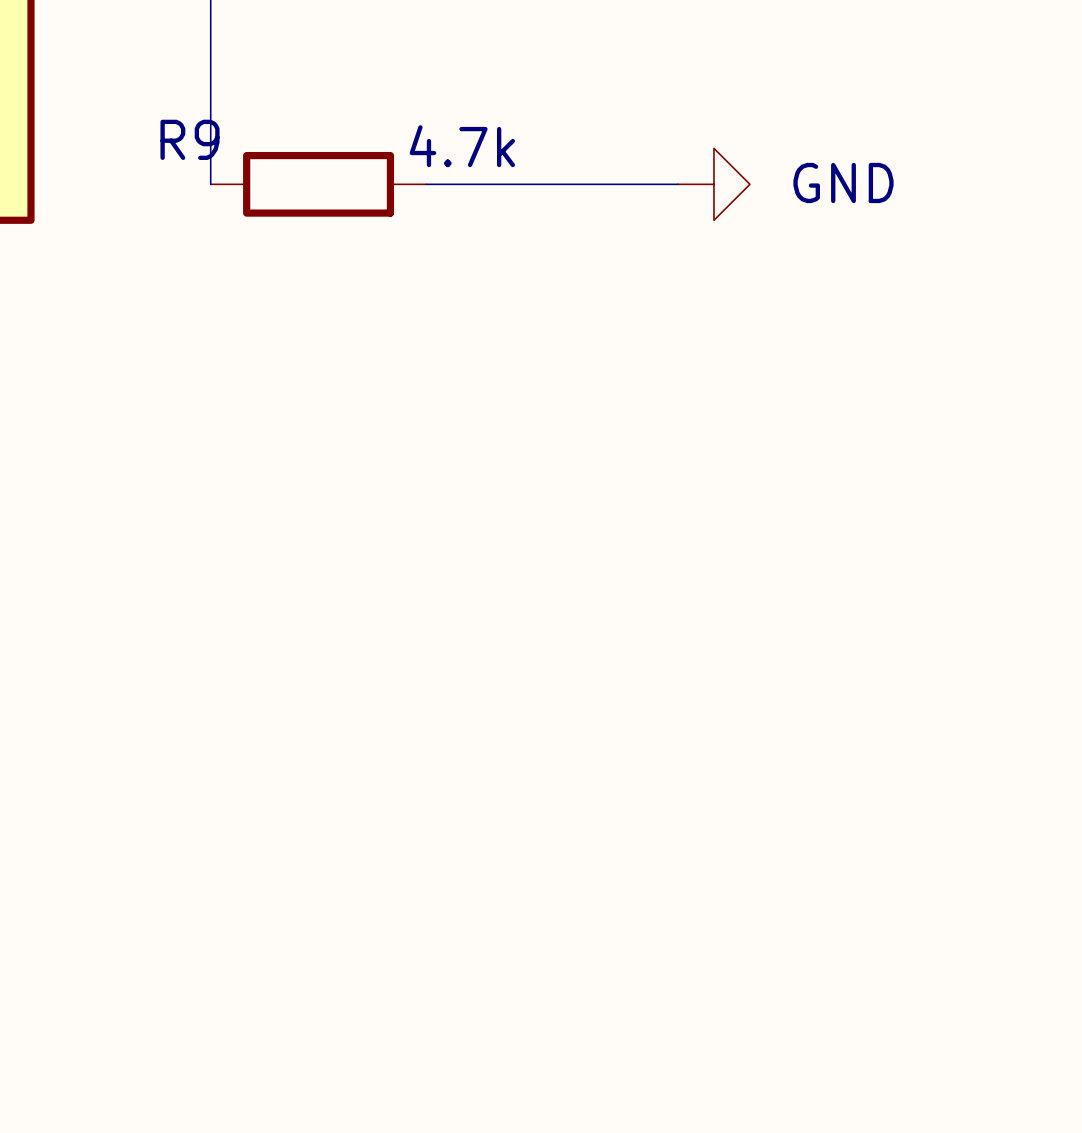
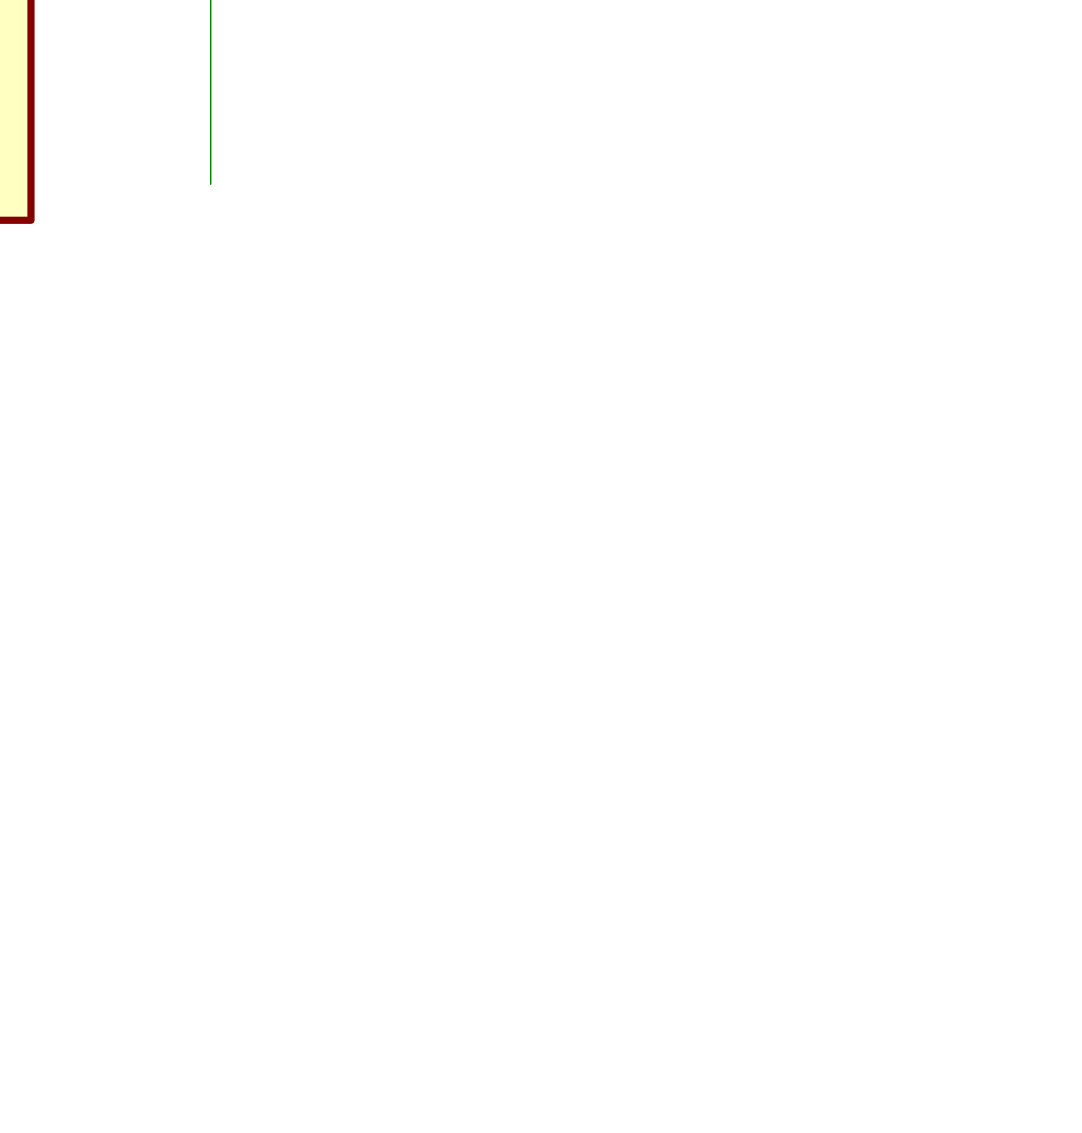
R9: 4.7k (318, 184) -> none
wire: (426, 184) (678, 184) -> none
power symbol: GND (713, 184) -> none

